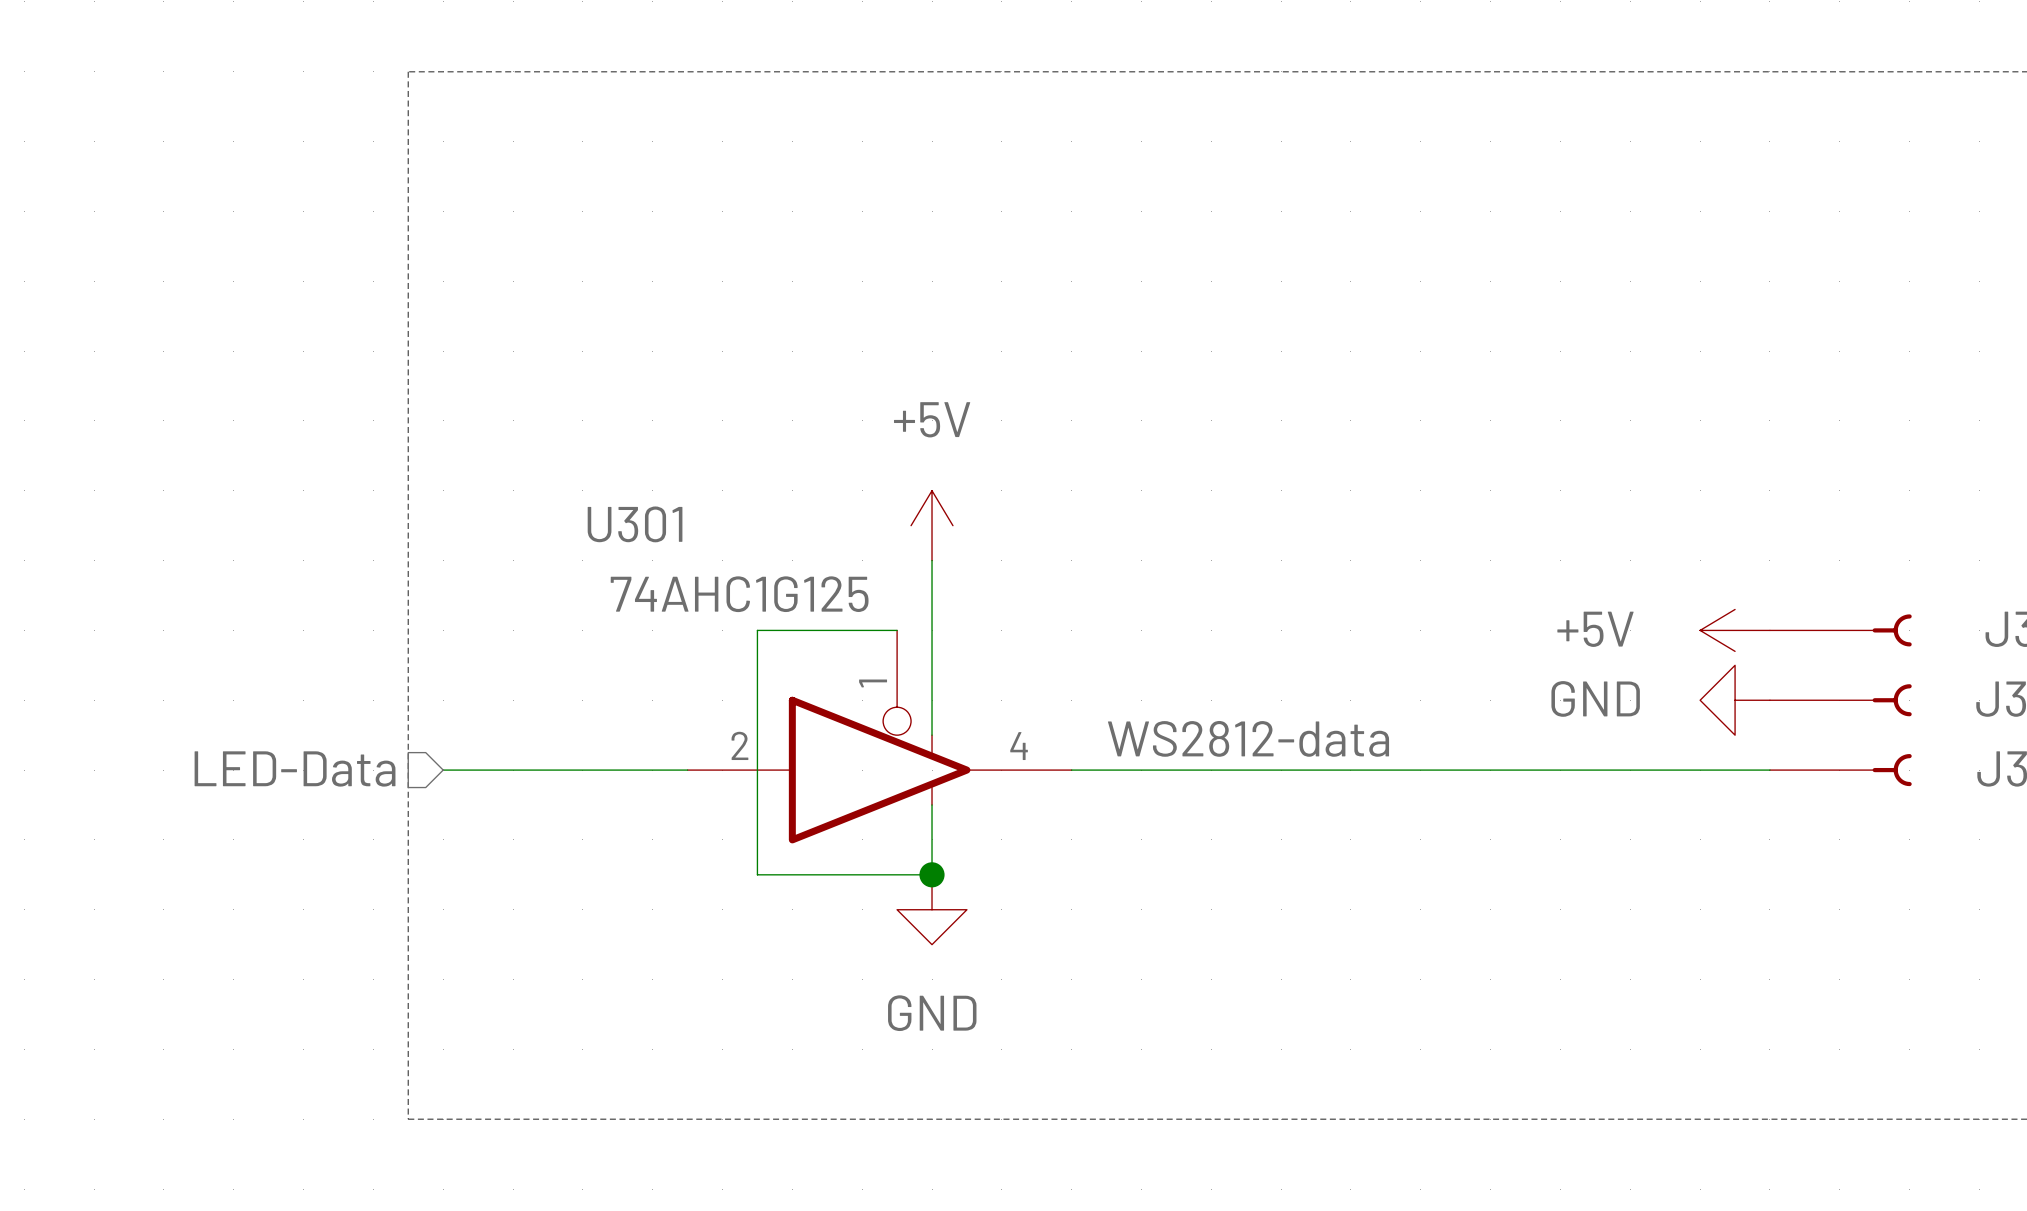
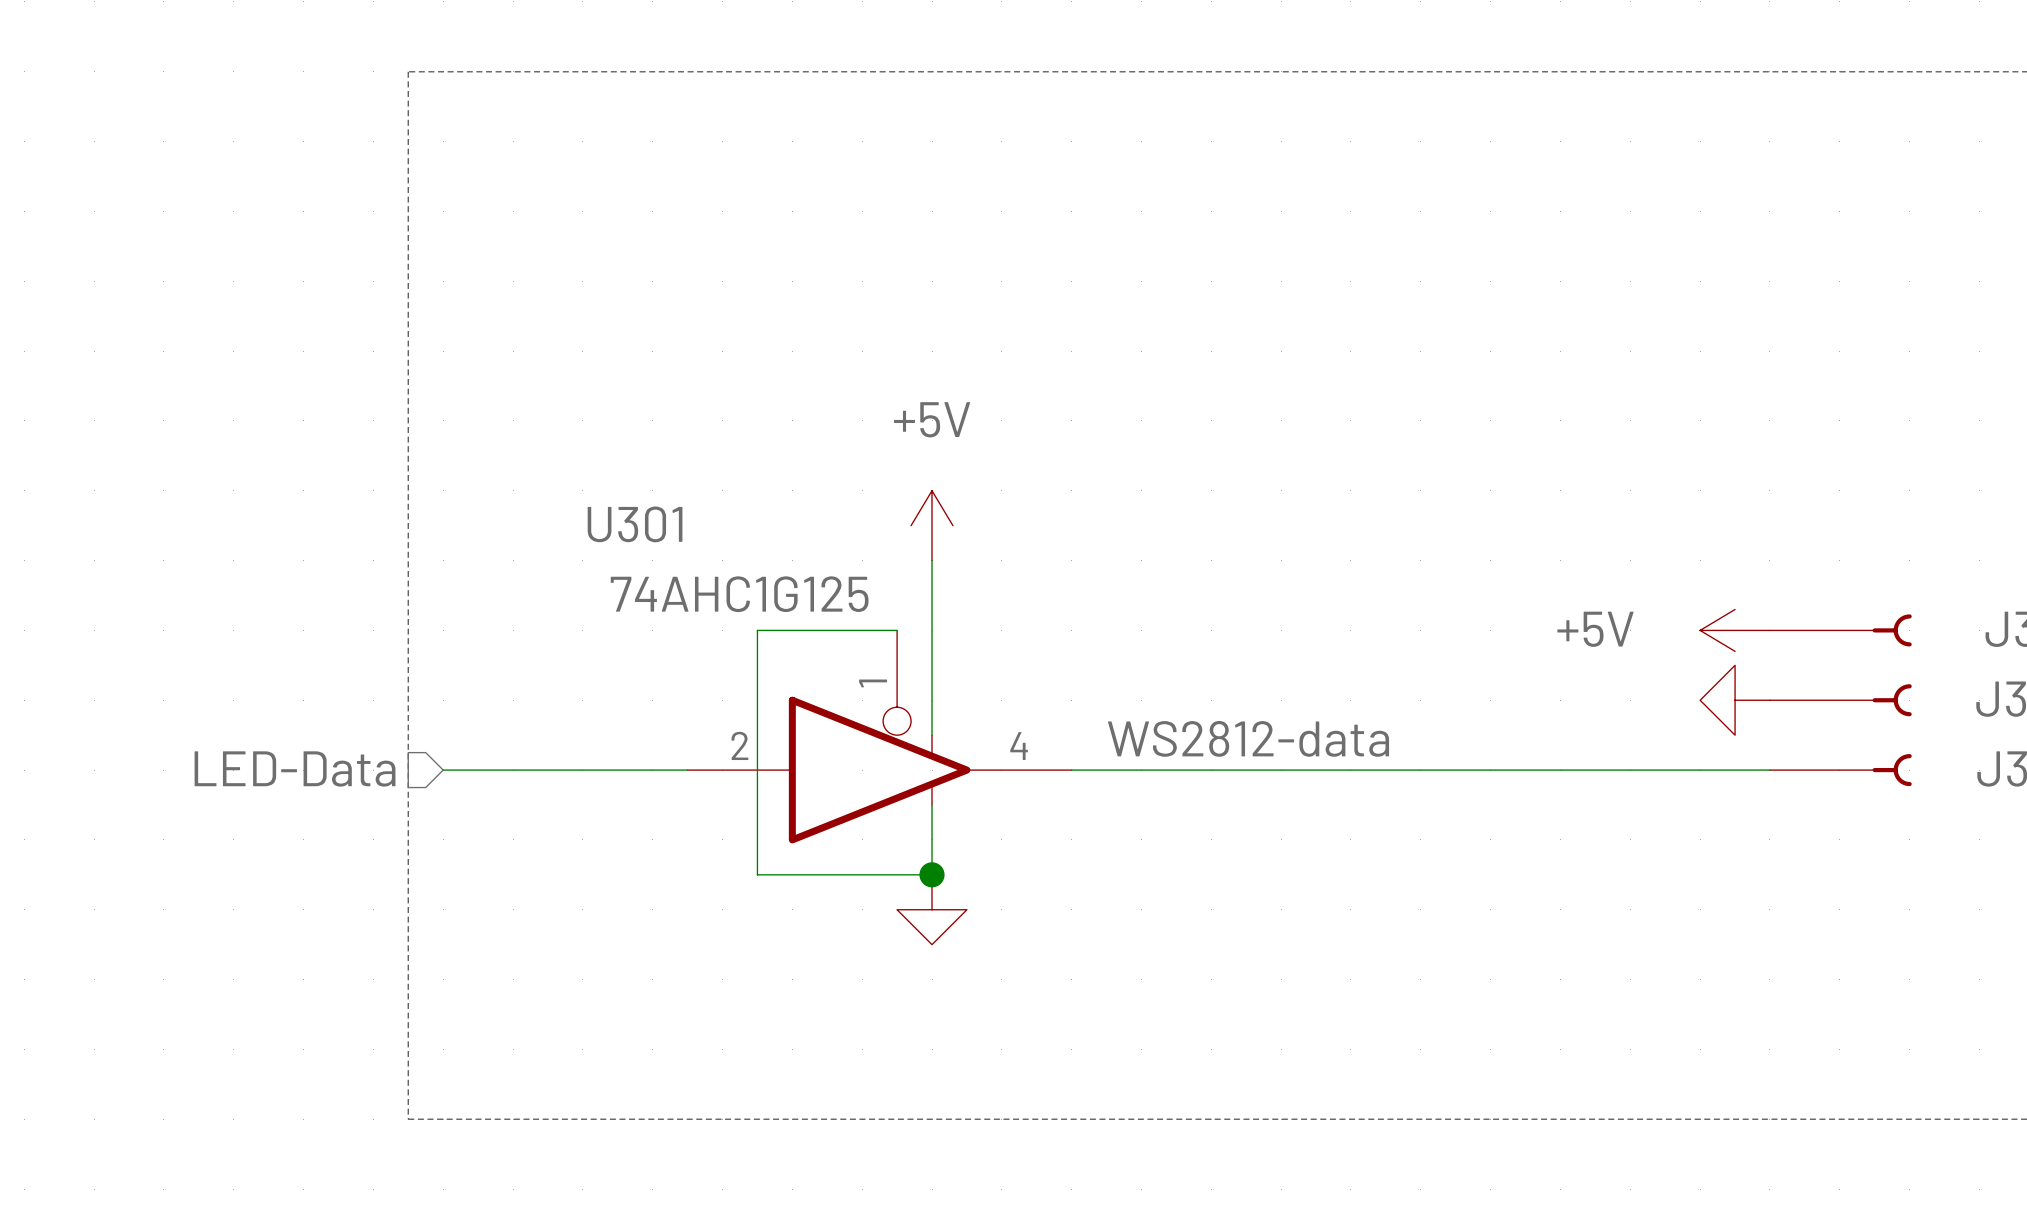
power symbol text: GND (1595, 698) -> none
power symbol text: GND (932, 1013) -> none

